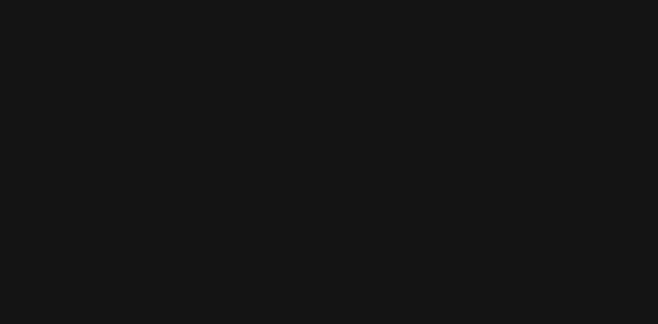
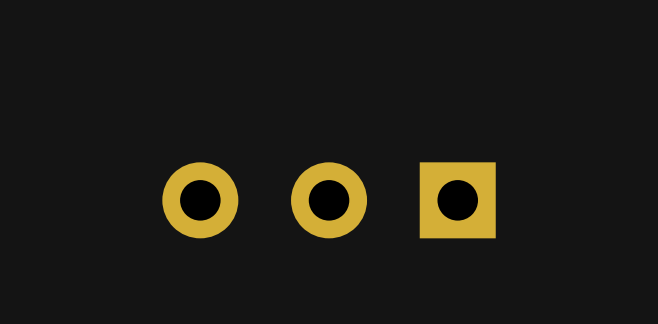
part: none -> (329, 200)

